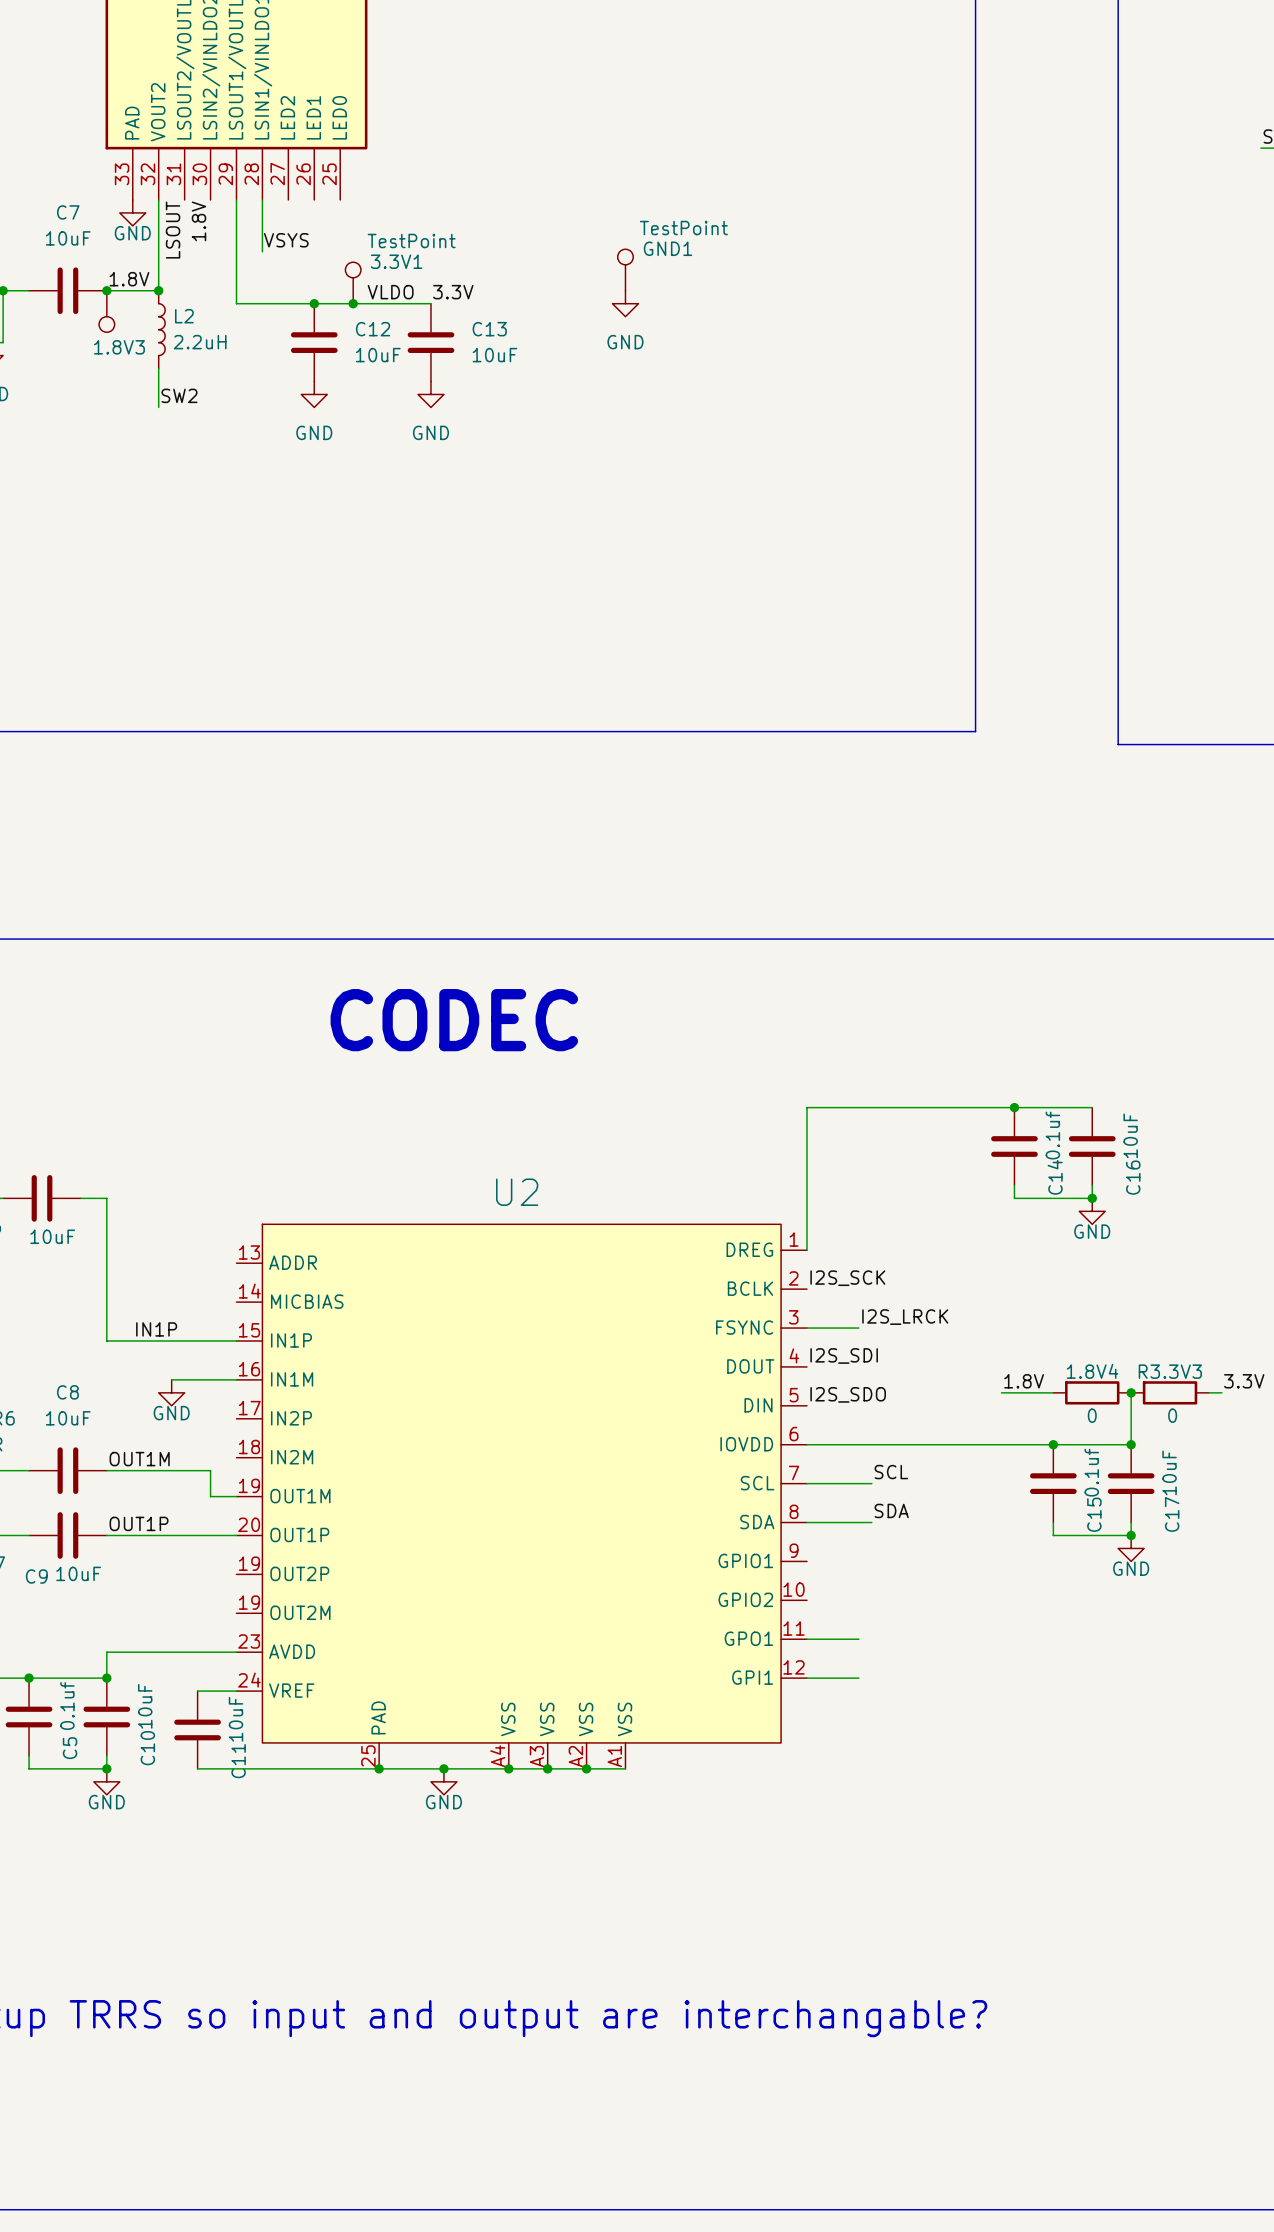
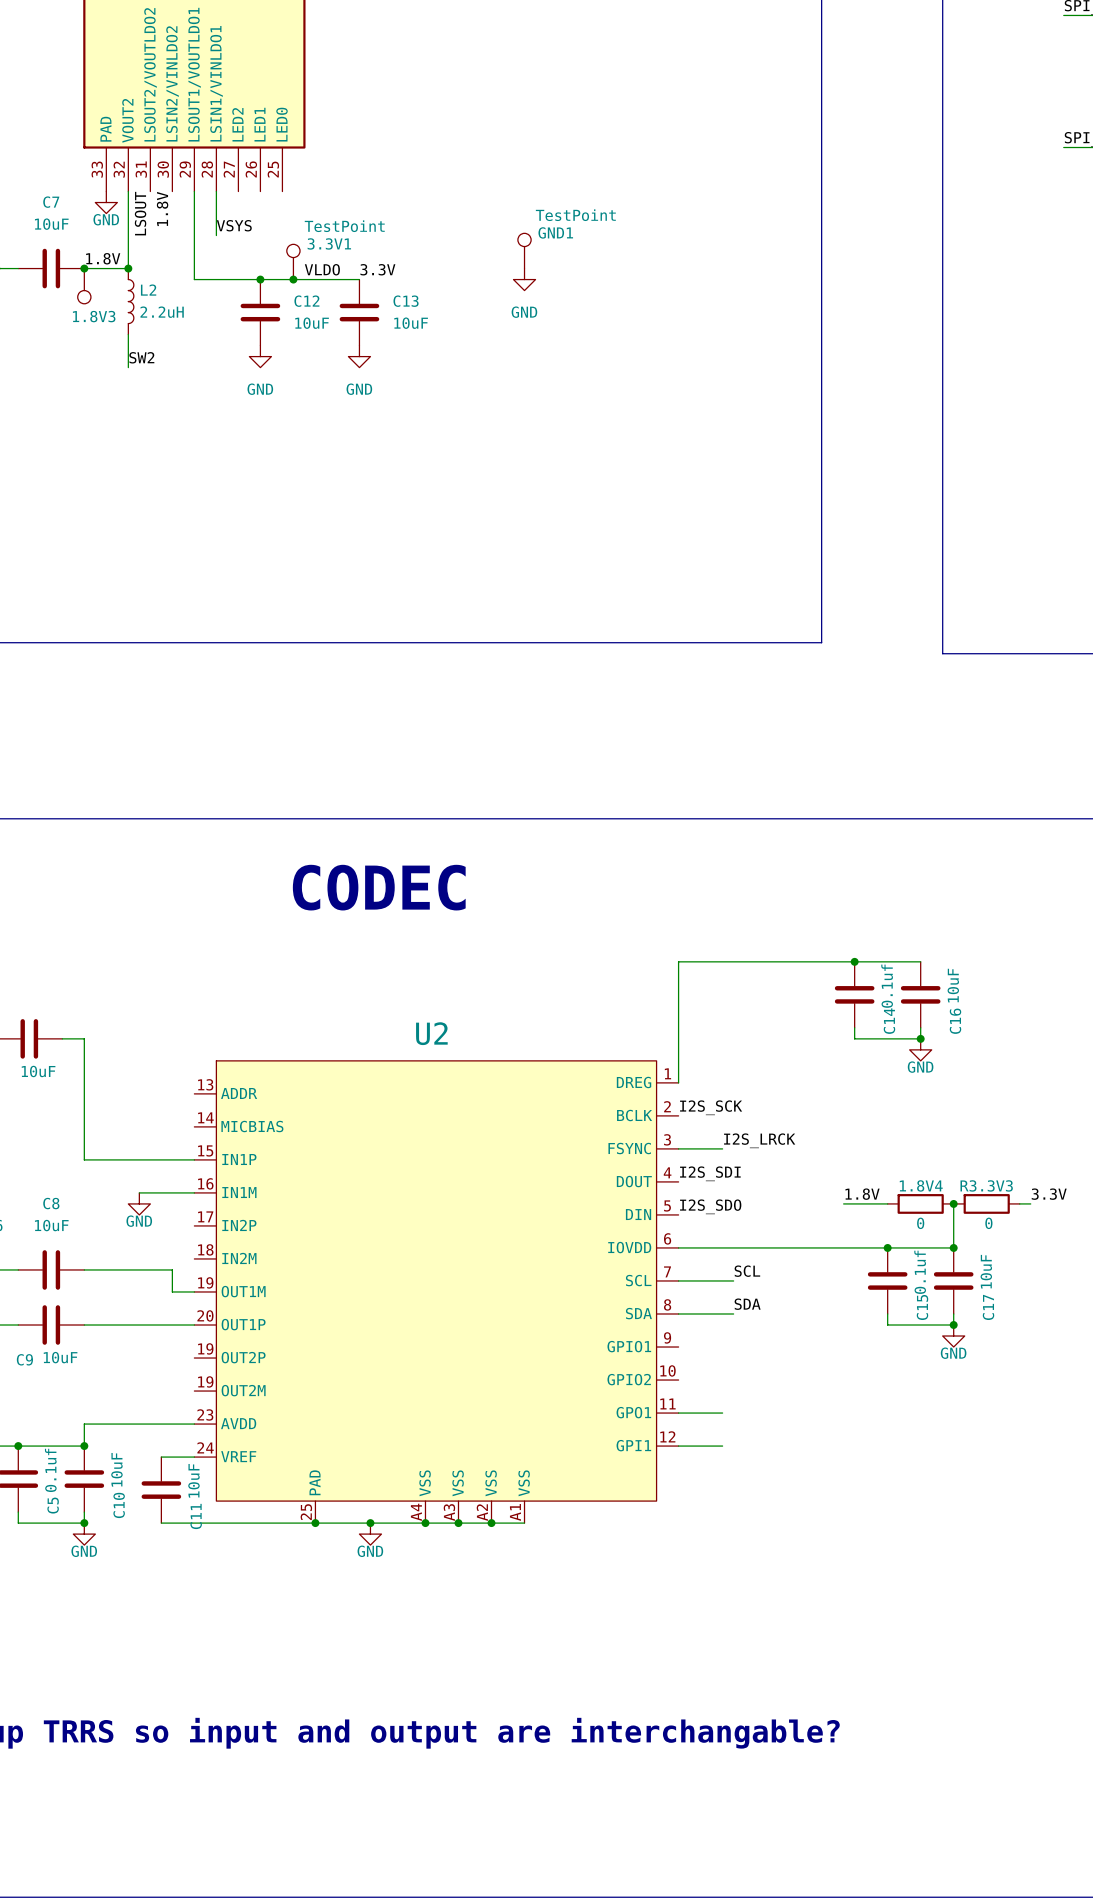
label: IN1P (156, 1329) -> none
label: OUT1M (139, 1459) -> none
label: OUT1P (139, 1523) -> none

